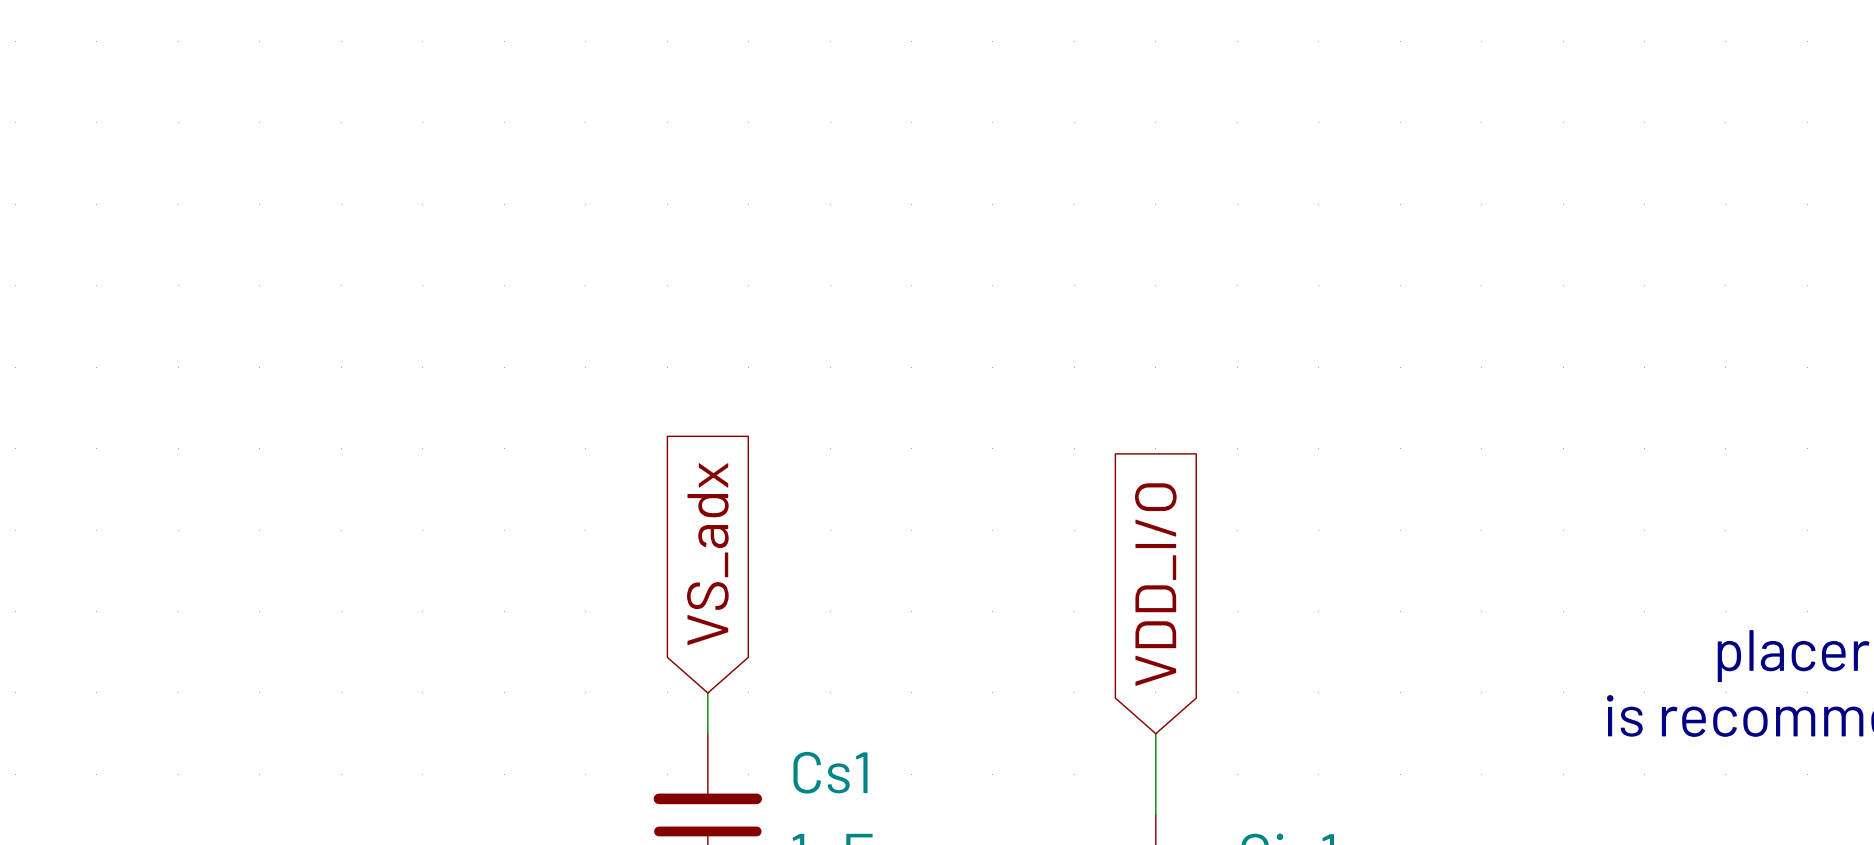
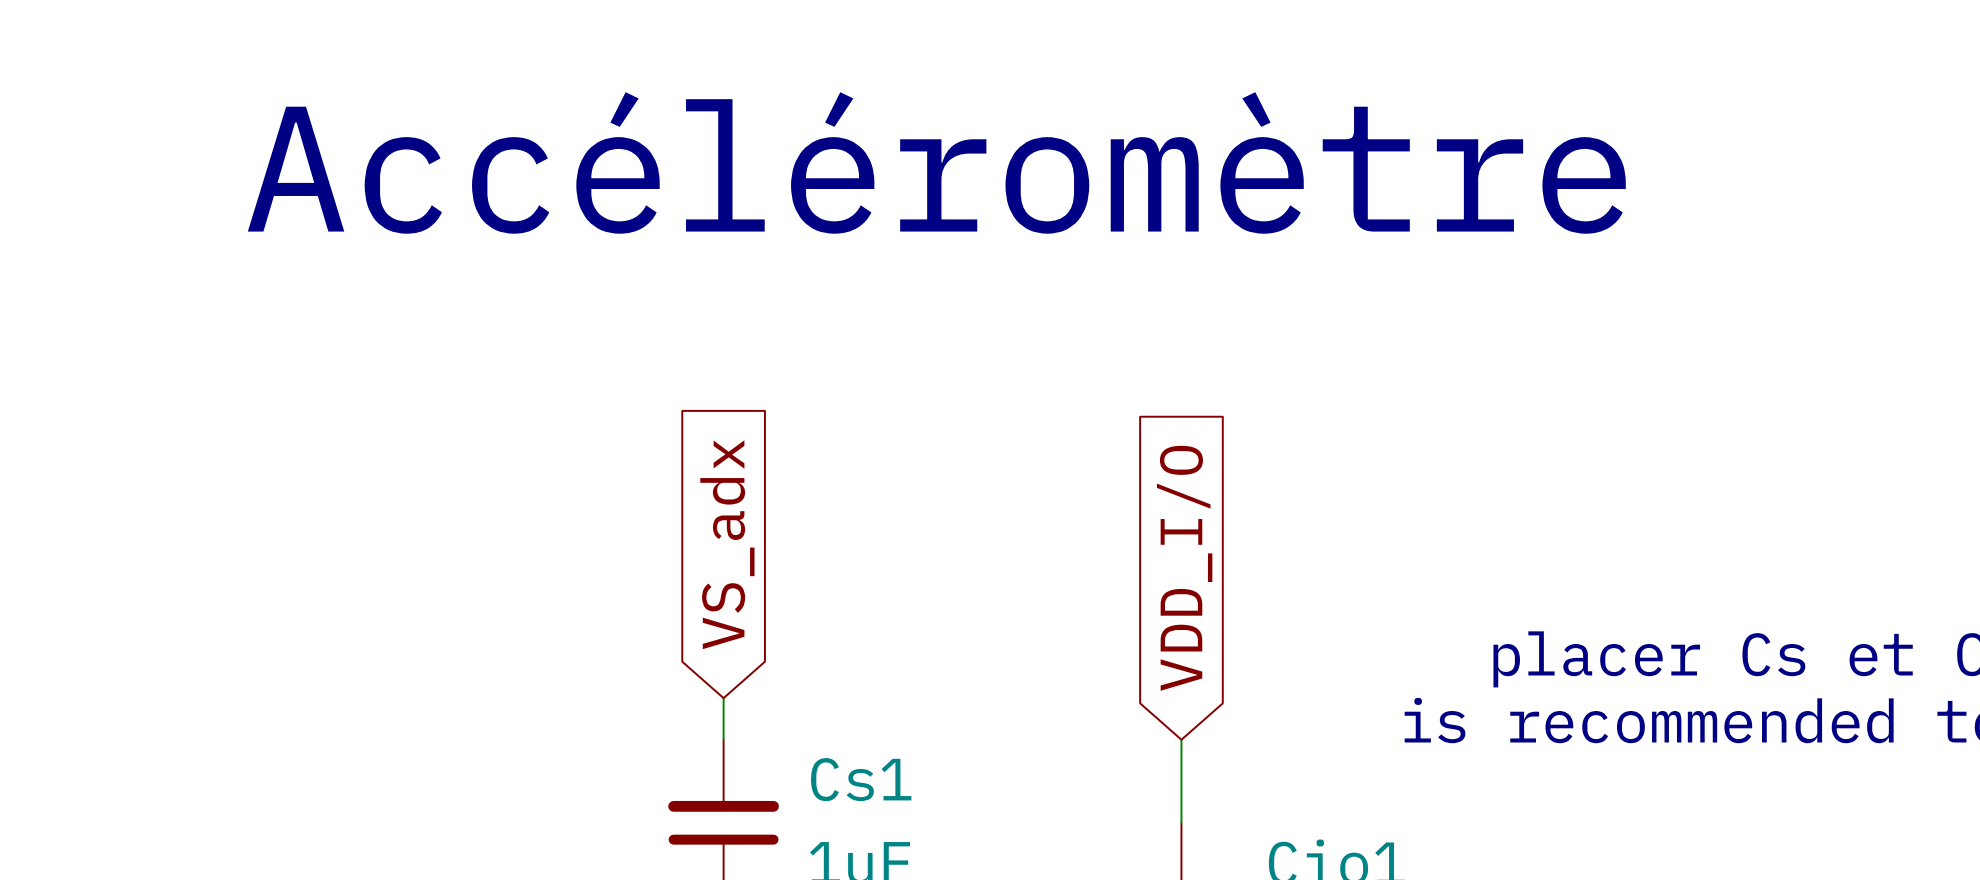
text: none -> Accéléromètre (936, 162)

